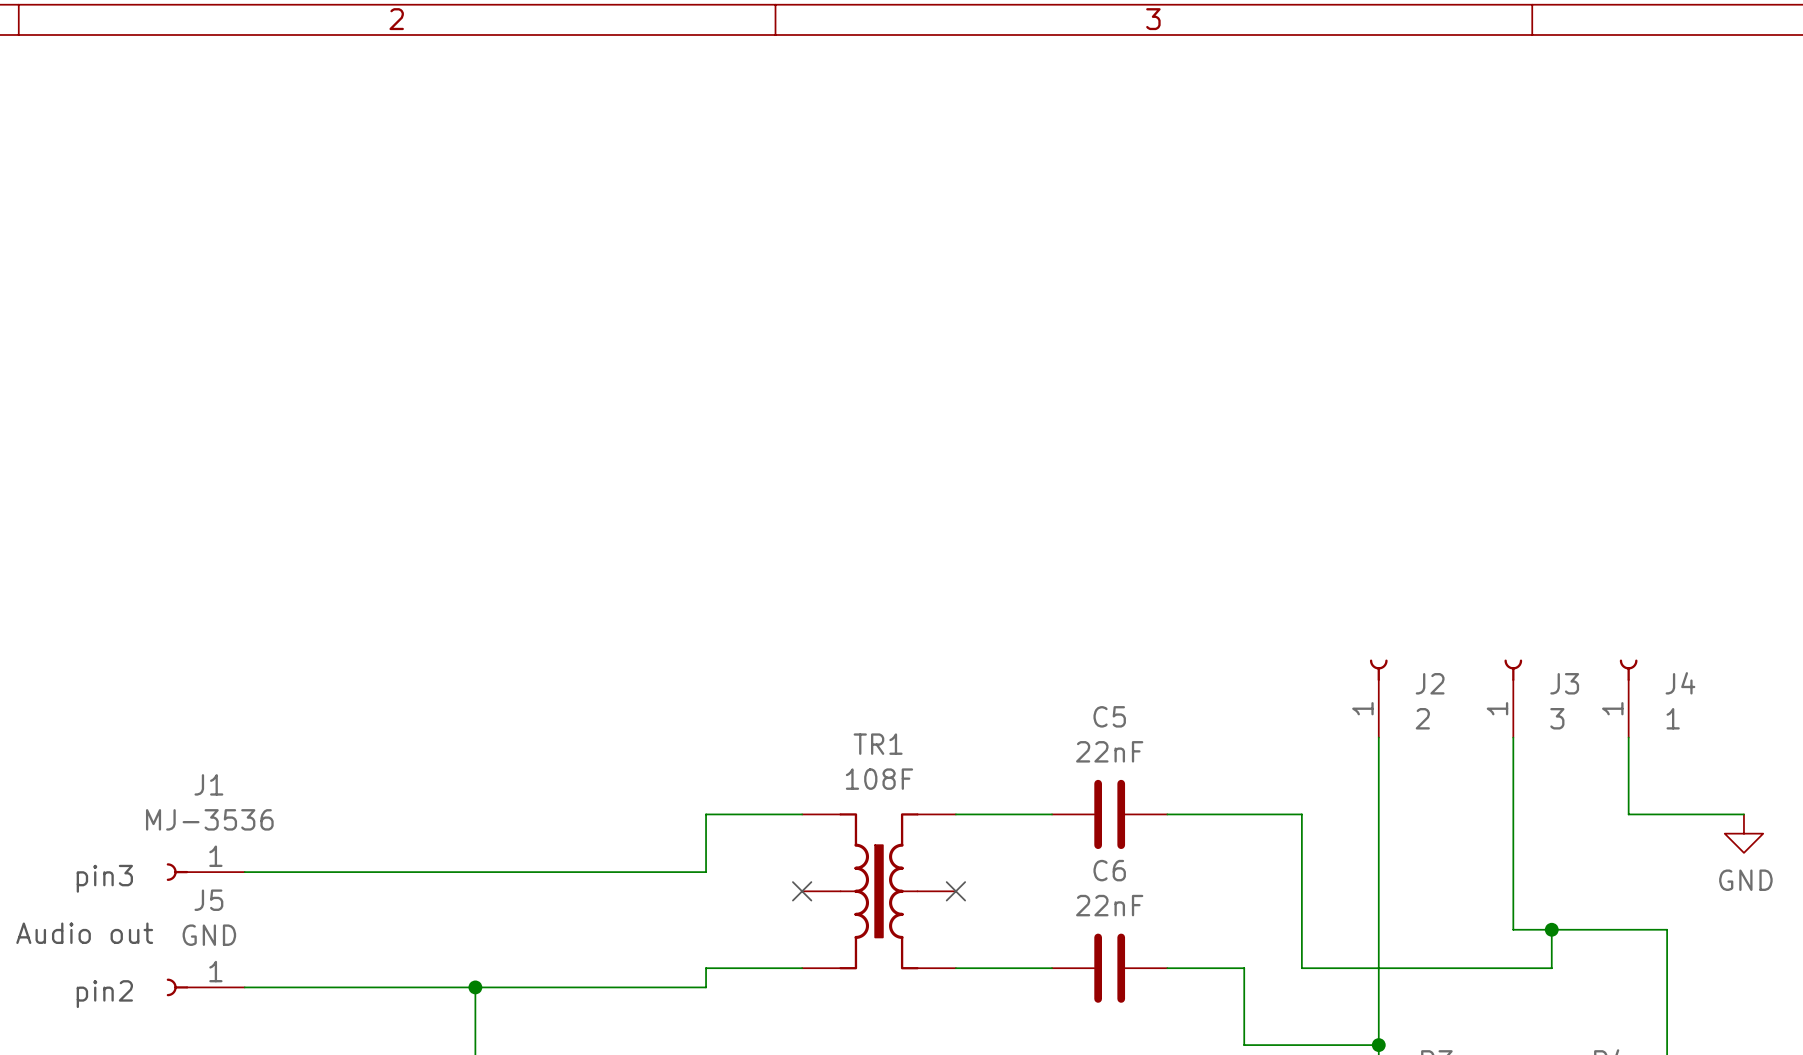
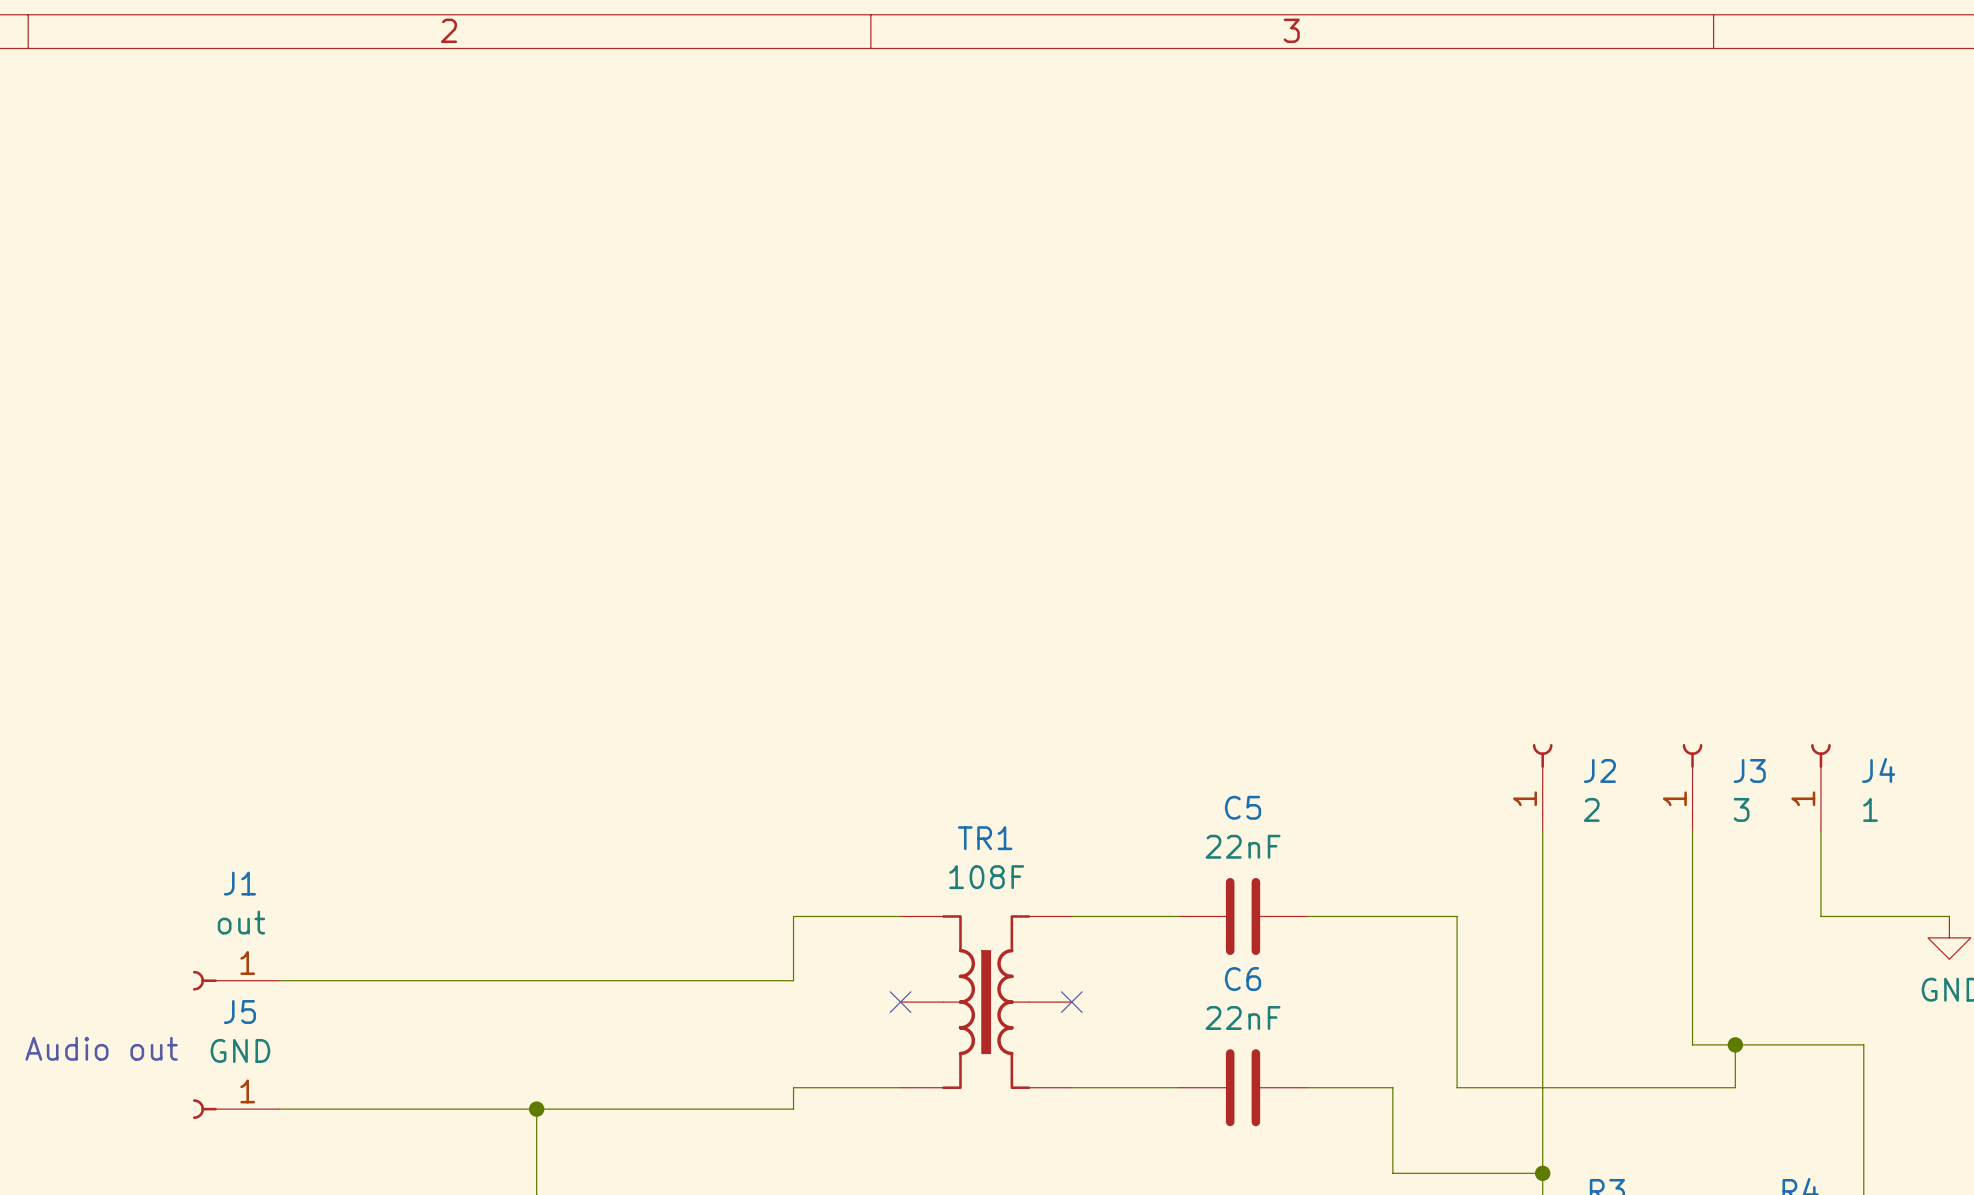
J1 value: MJ-3536 (209, 819) -> out (241, 922)
text: pin3 (104, 878) -> none
text: pin2 (104, 994) -> none

